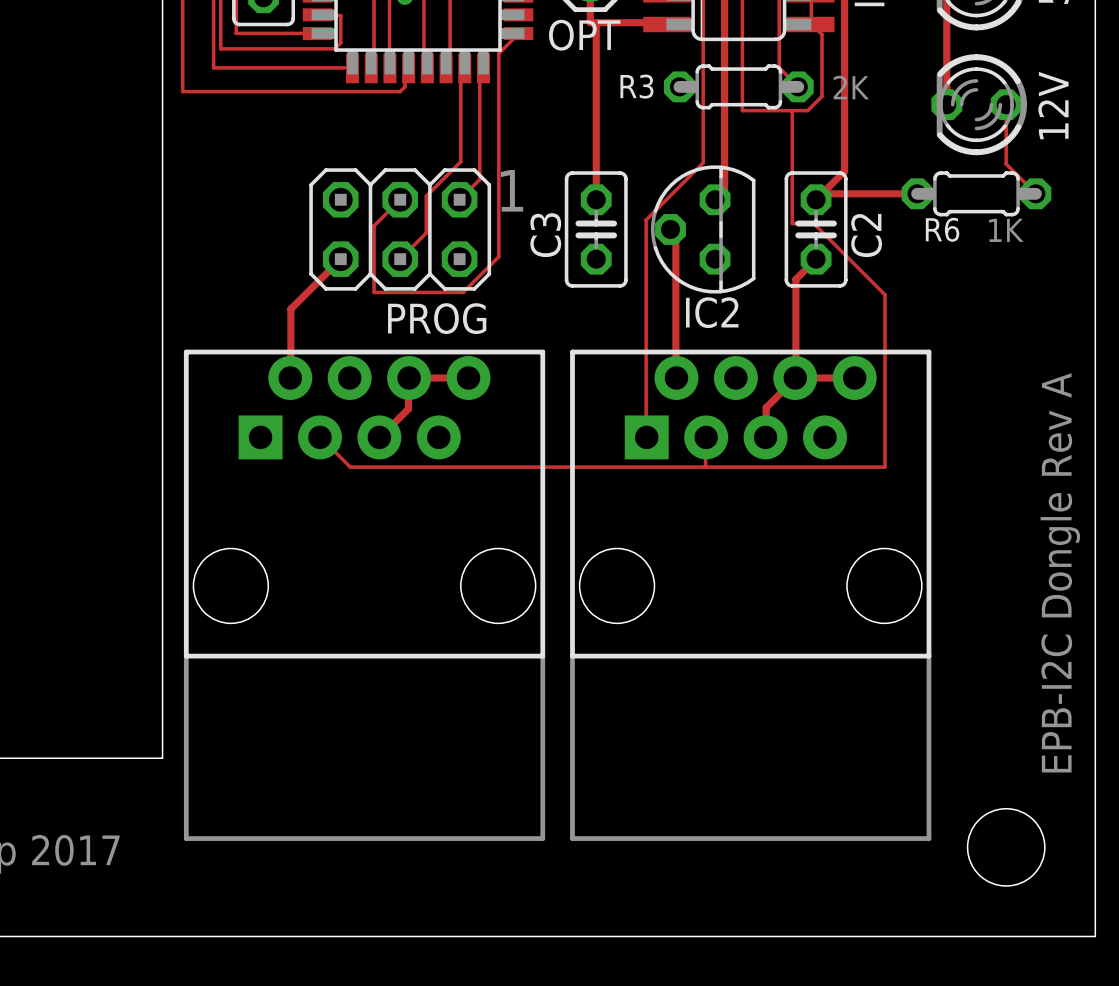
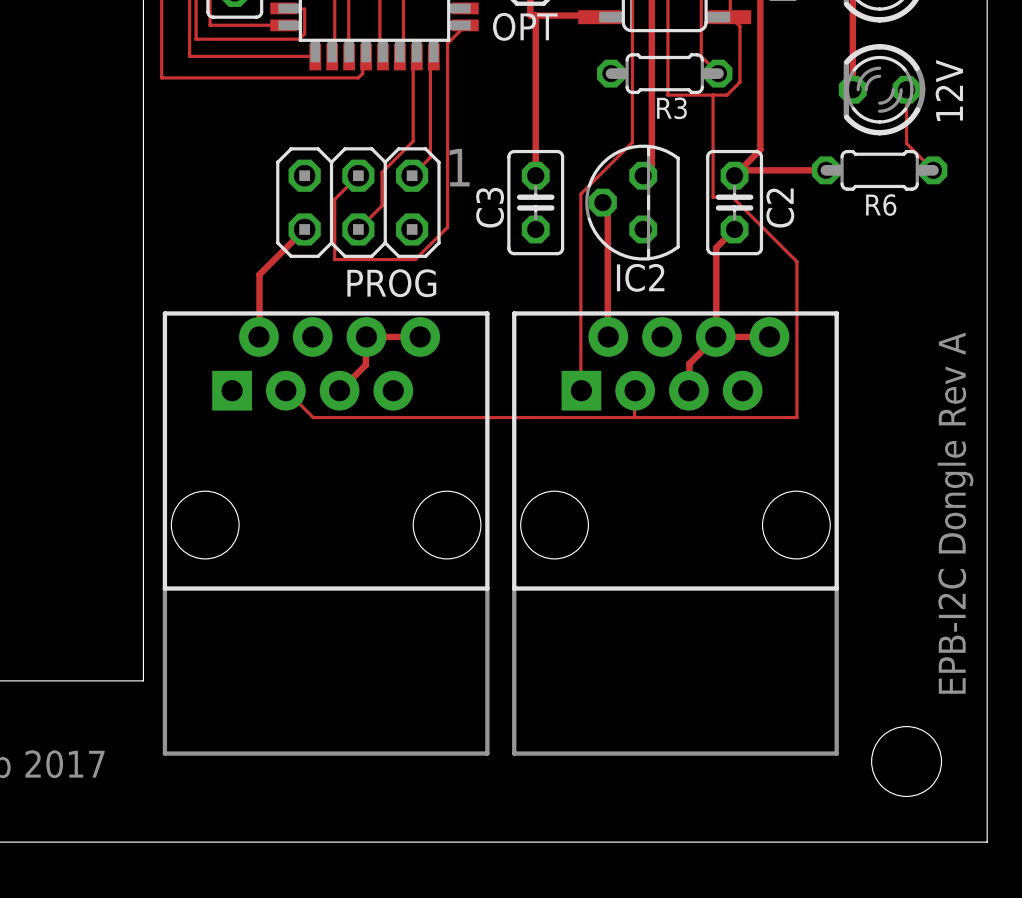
R3 name position: R3 (636, 86) -> R3 (671, 108)
R3 value: 2K (851, 87) -> none
R6 name position: R6 (942, 229) -> R6 (881, 205)
R6 value: 1K (1006, 230) -> none

